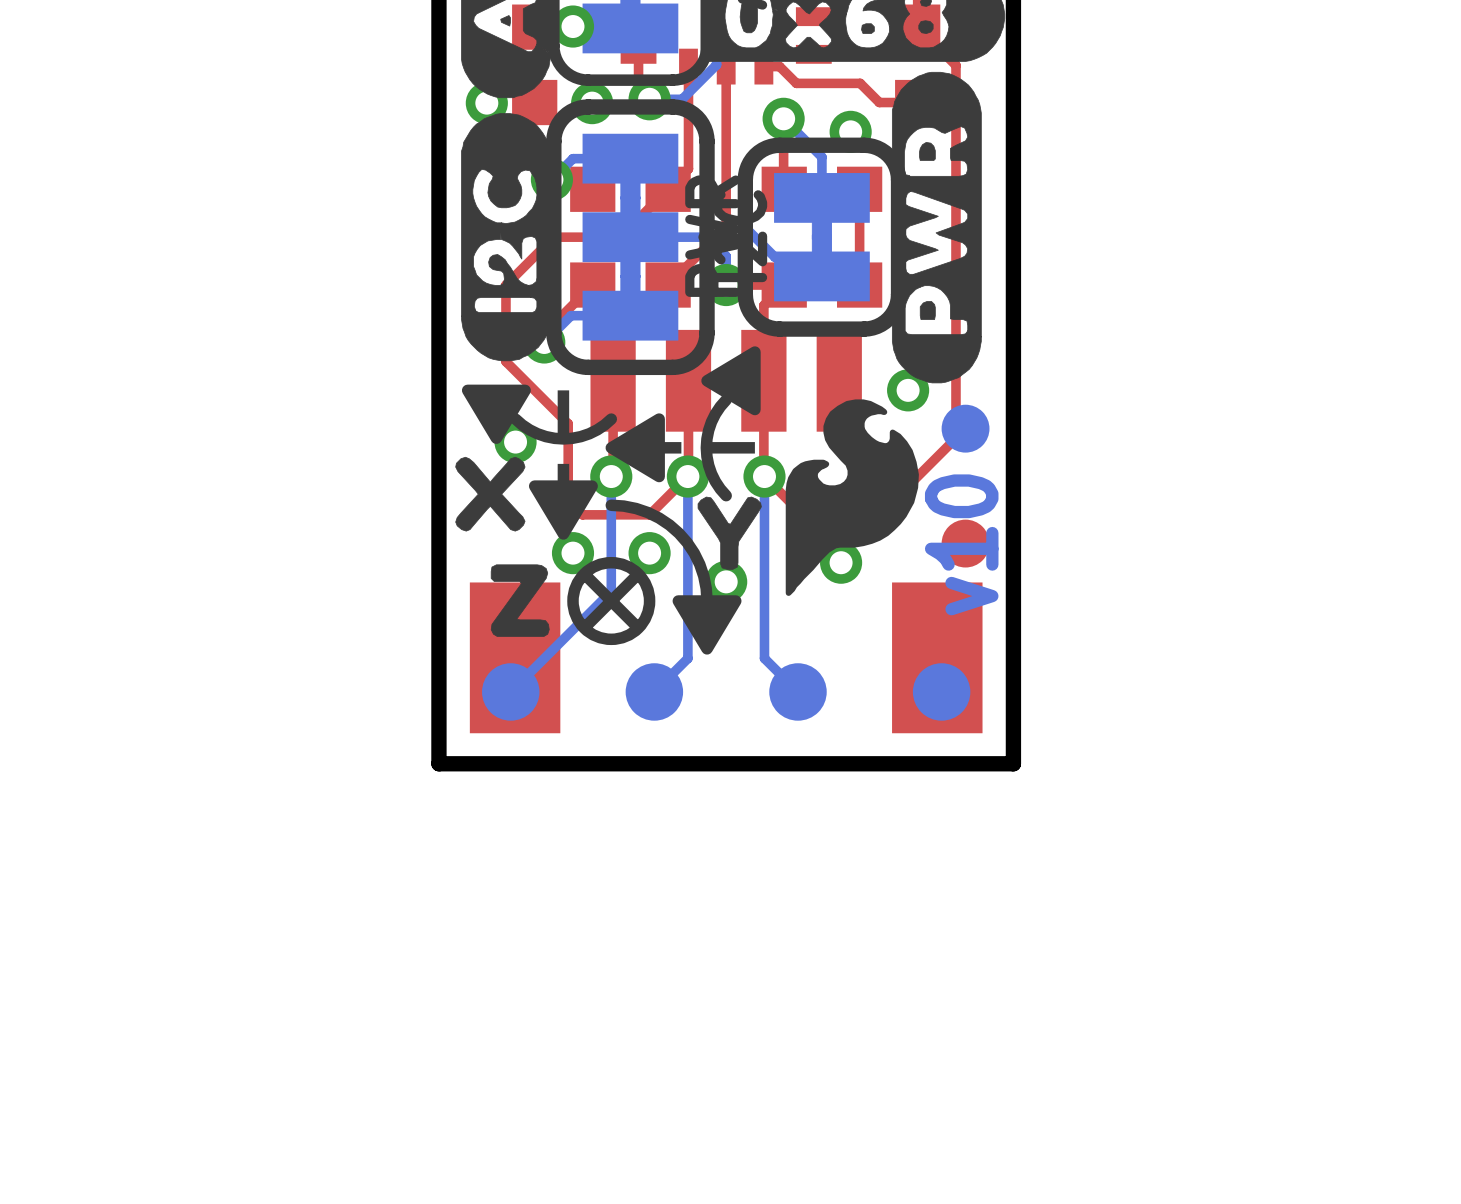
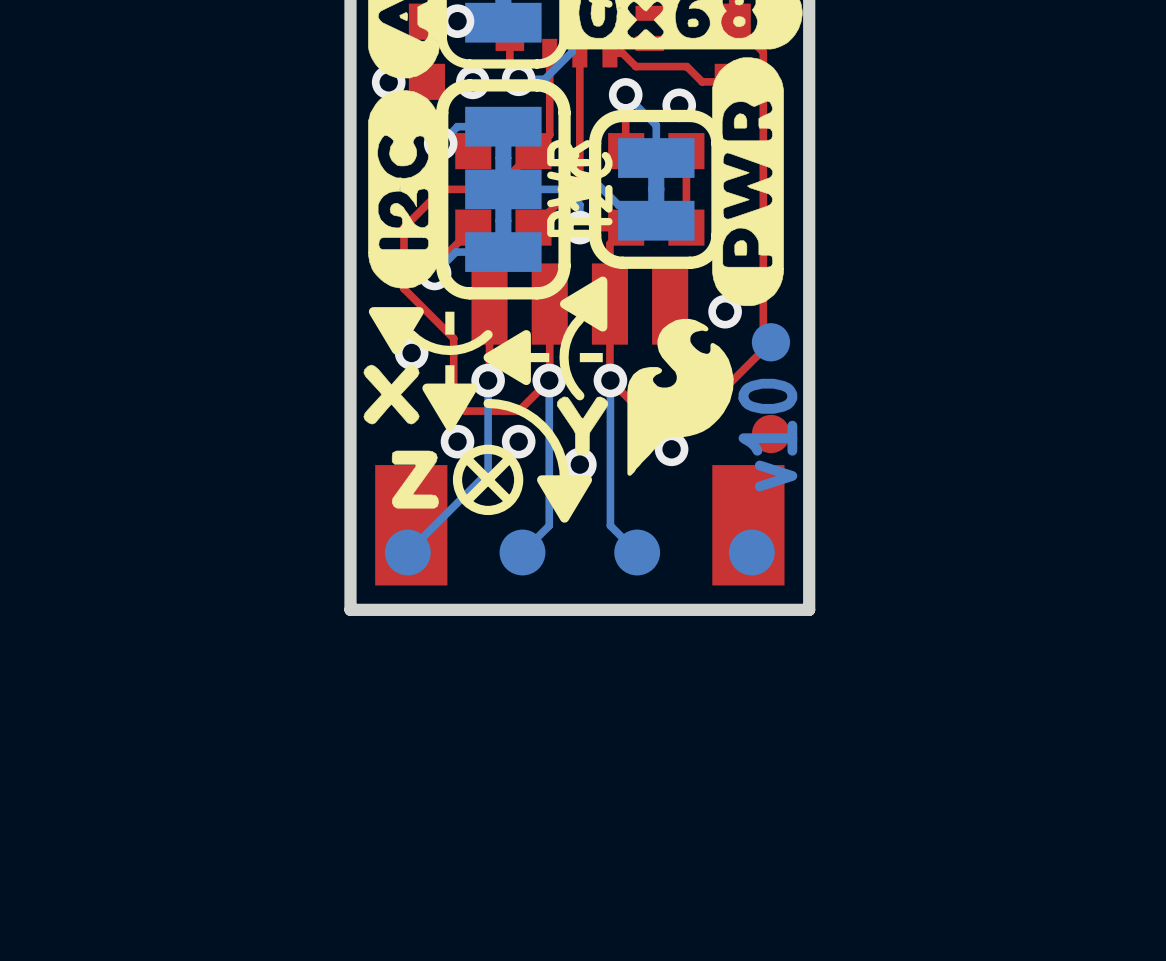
line: (563, 419) (563, 457) -> none
line: (726, 447) (687, 447) -> none

